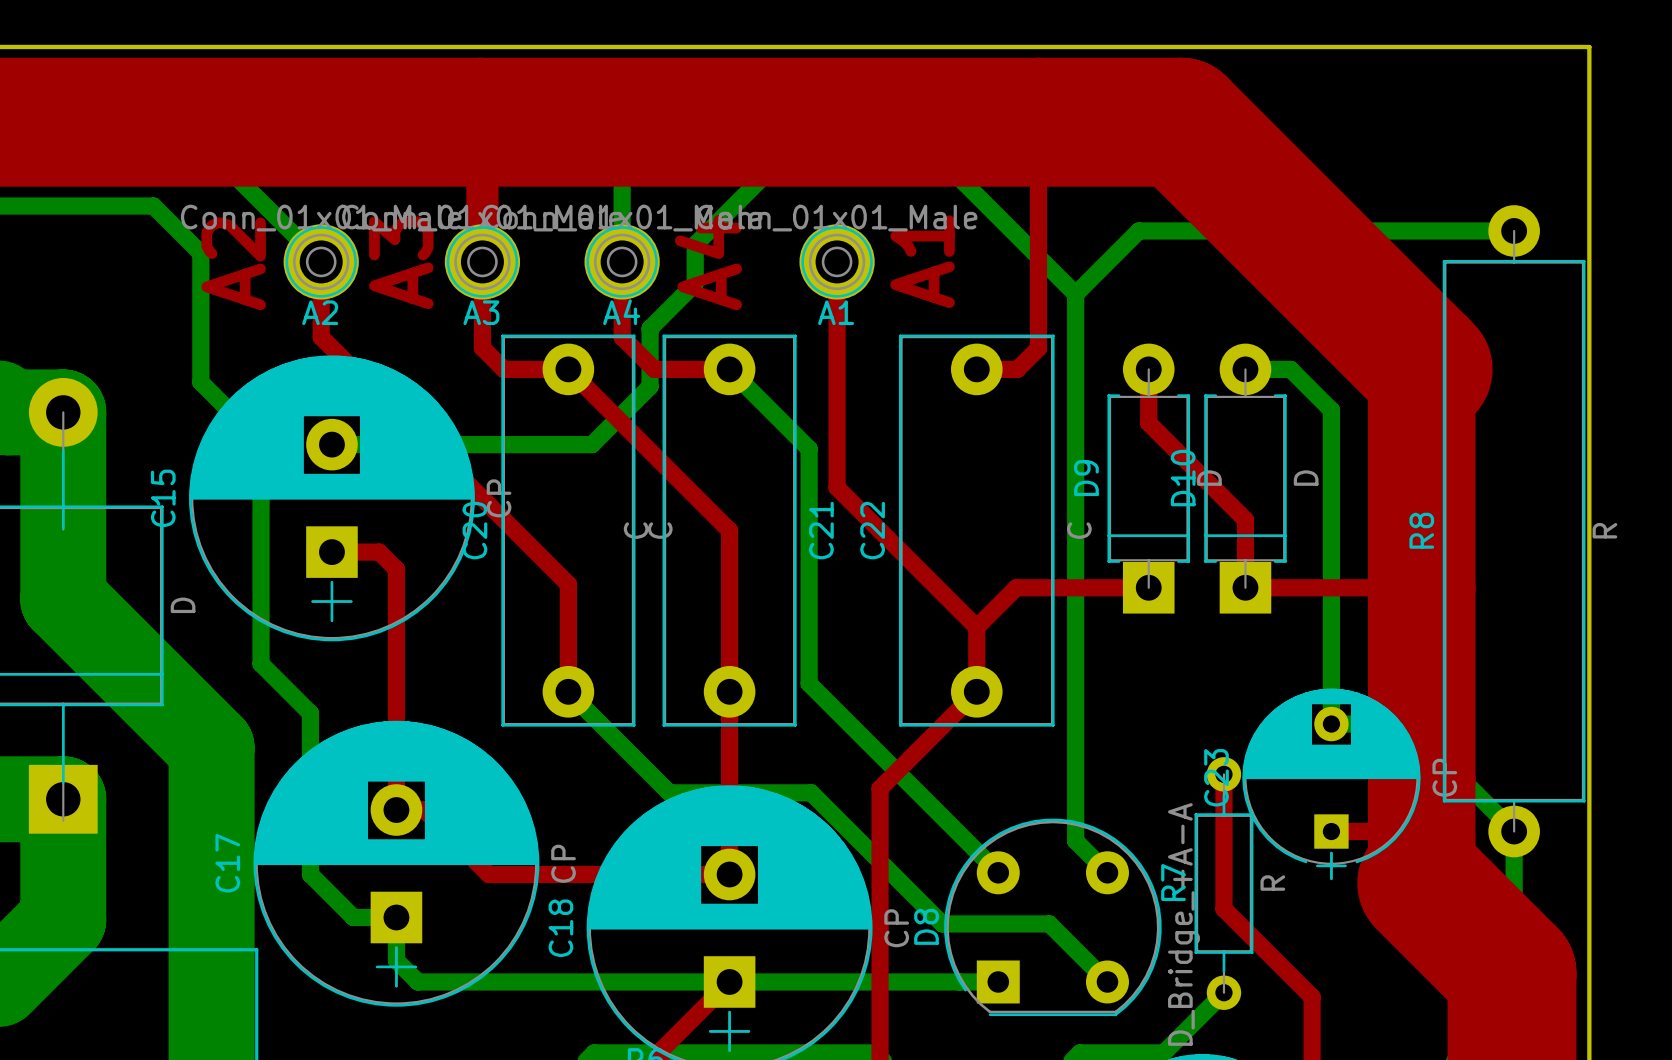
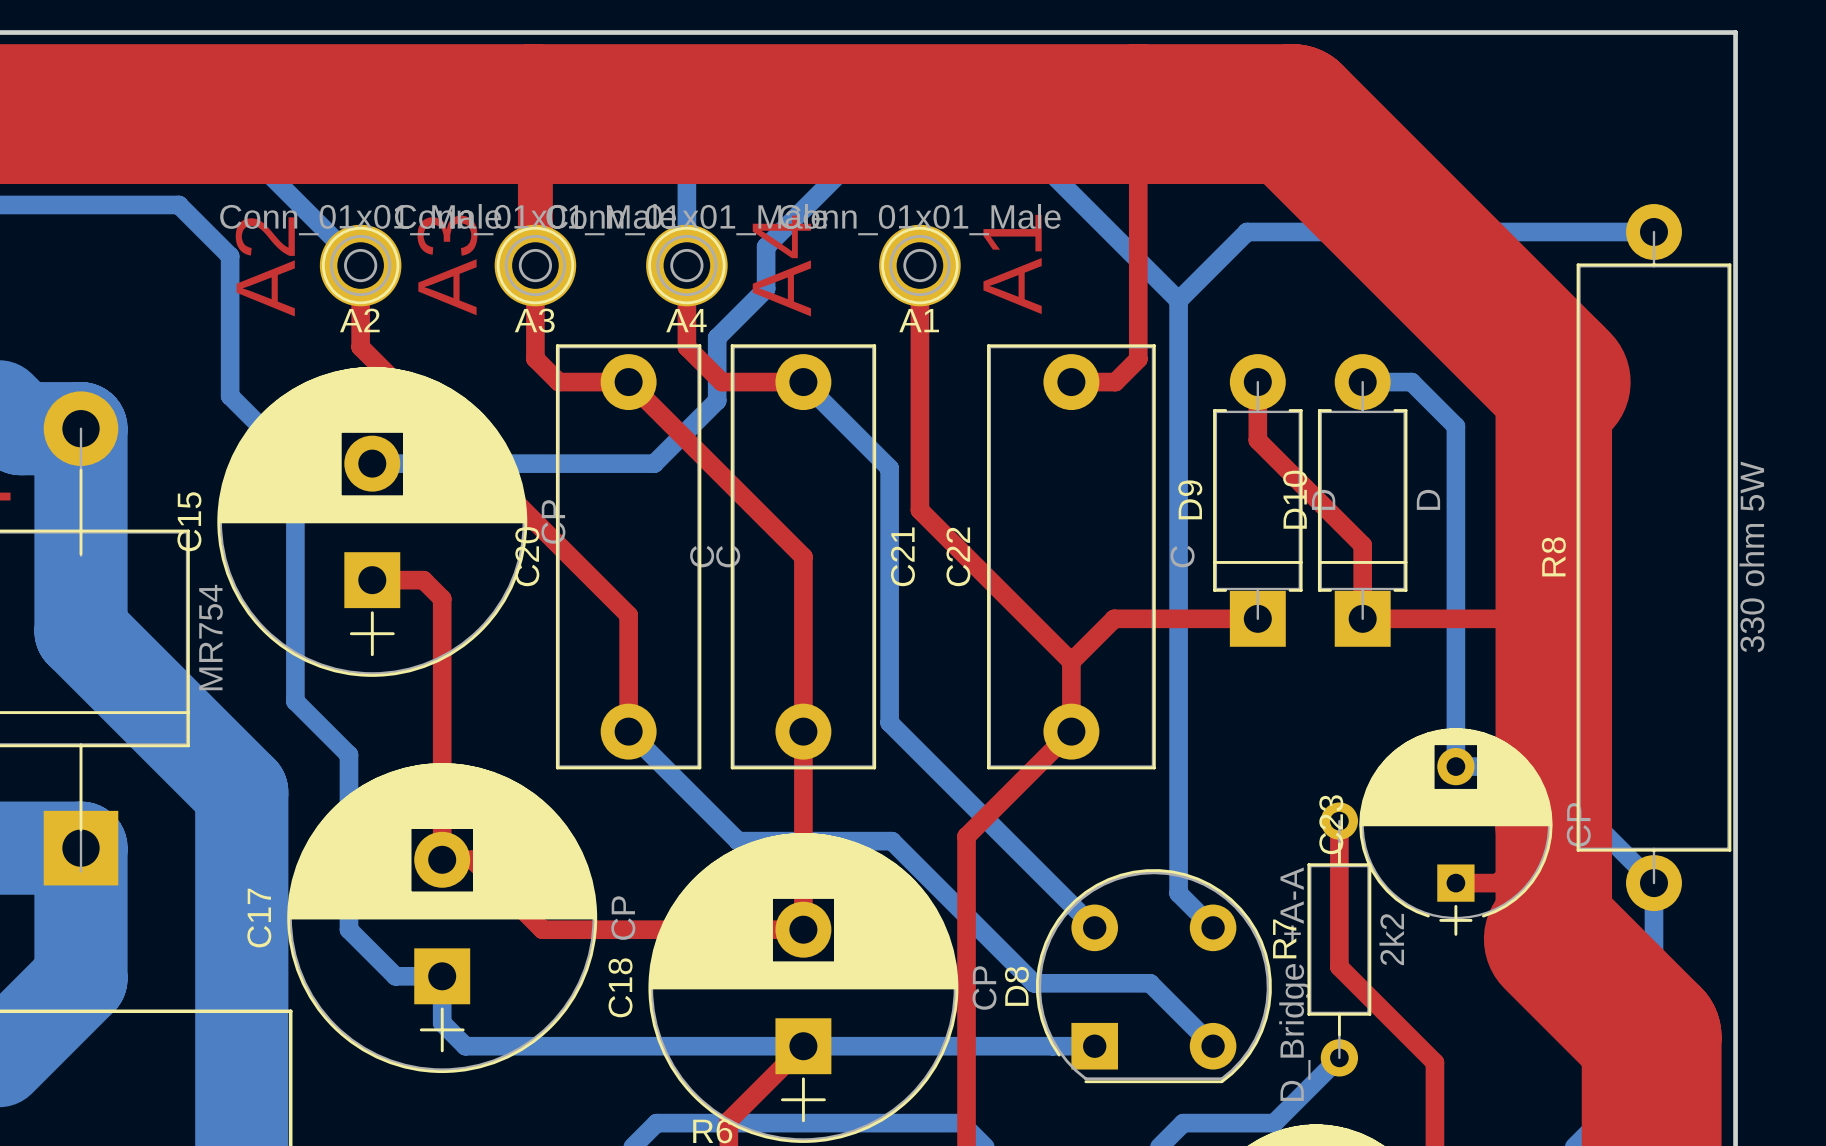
R8 value: R (1604, 530) -> 330 ohm 5W (1751, 556)
part value: D (183, 605) -> MR754 (211, 637)
R7 value: R (1272, 883) -> 2k2 (1391, 939)

